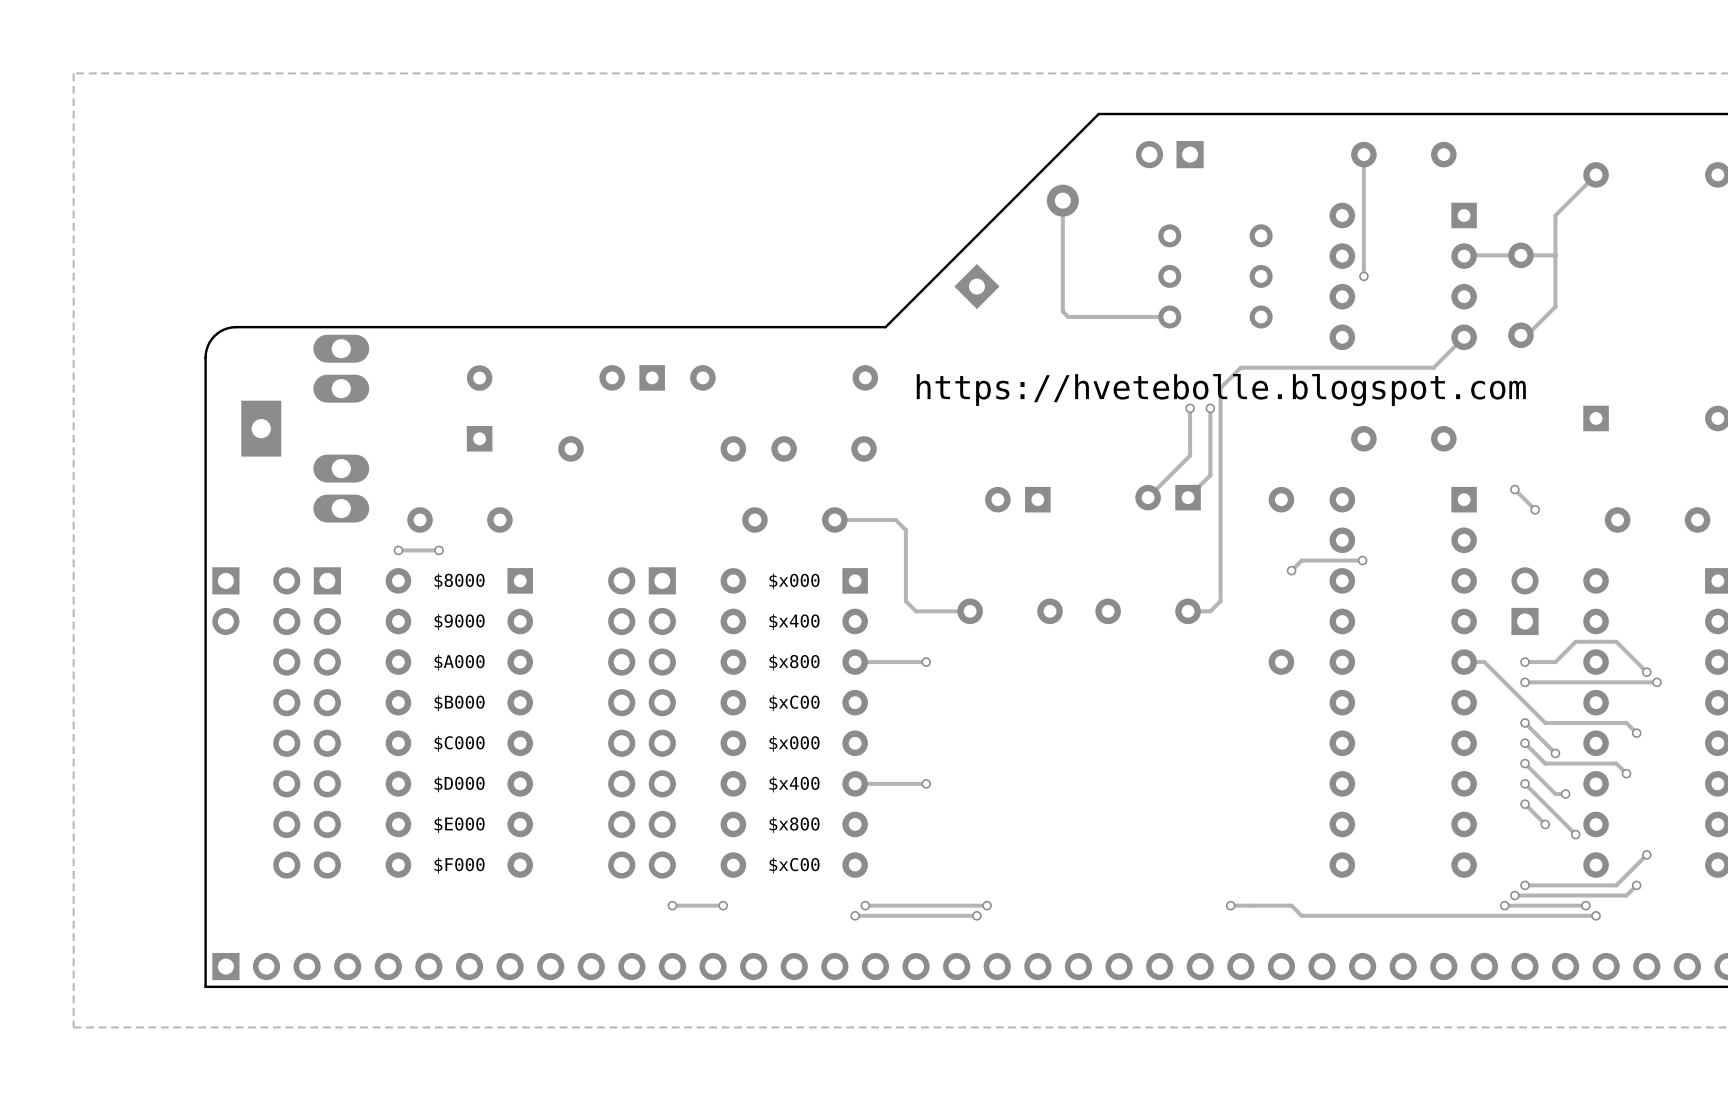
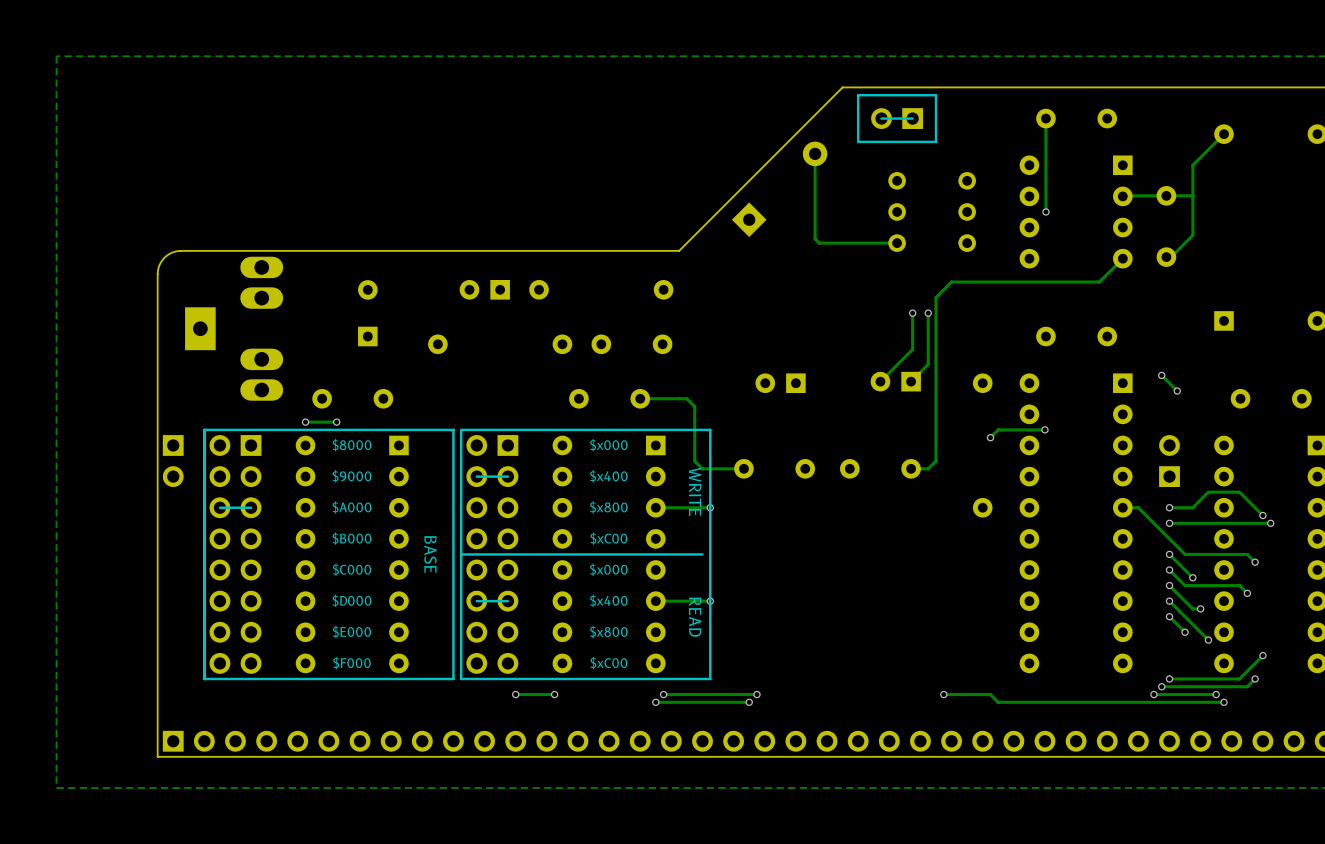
line: none -> (936, 95) (936, 141) (858, 141) (858, 95) (936, 95)
line: none -> (912, 118) (881, 118)
text: https://hvetebolle.blogspot.com (1221, 390) -> none
line: none -> (453, 429) (204, 429) (204, 678) (453, 678) (453, 429)
line: none -> (710, 429) (461, 429) (461, 678) (710, 678) (710, 429)
line: none -> (507, 476) (476, 476)
text: none -> WRITE (695, 491)
line: none -> (251, 507) (219, 507)
line: none -> (702, 554) (461, 554)
text: none -> BASE (430, 554)
line: none -> (507, 601) (476, 601)
text: none -> READ (695, 617)

